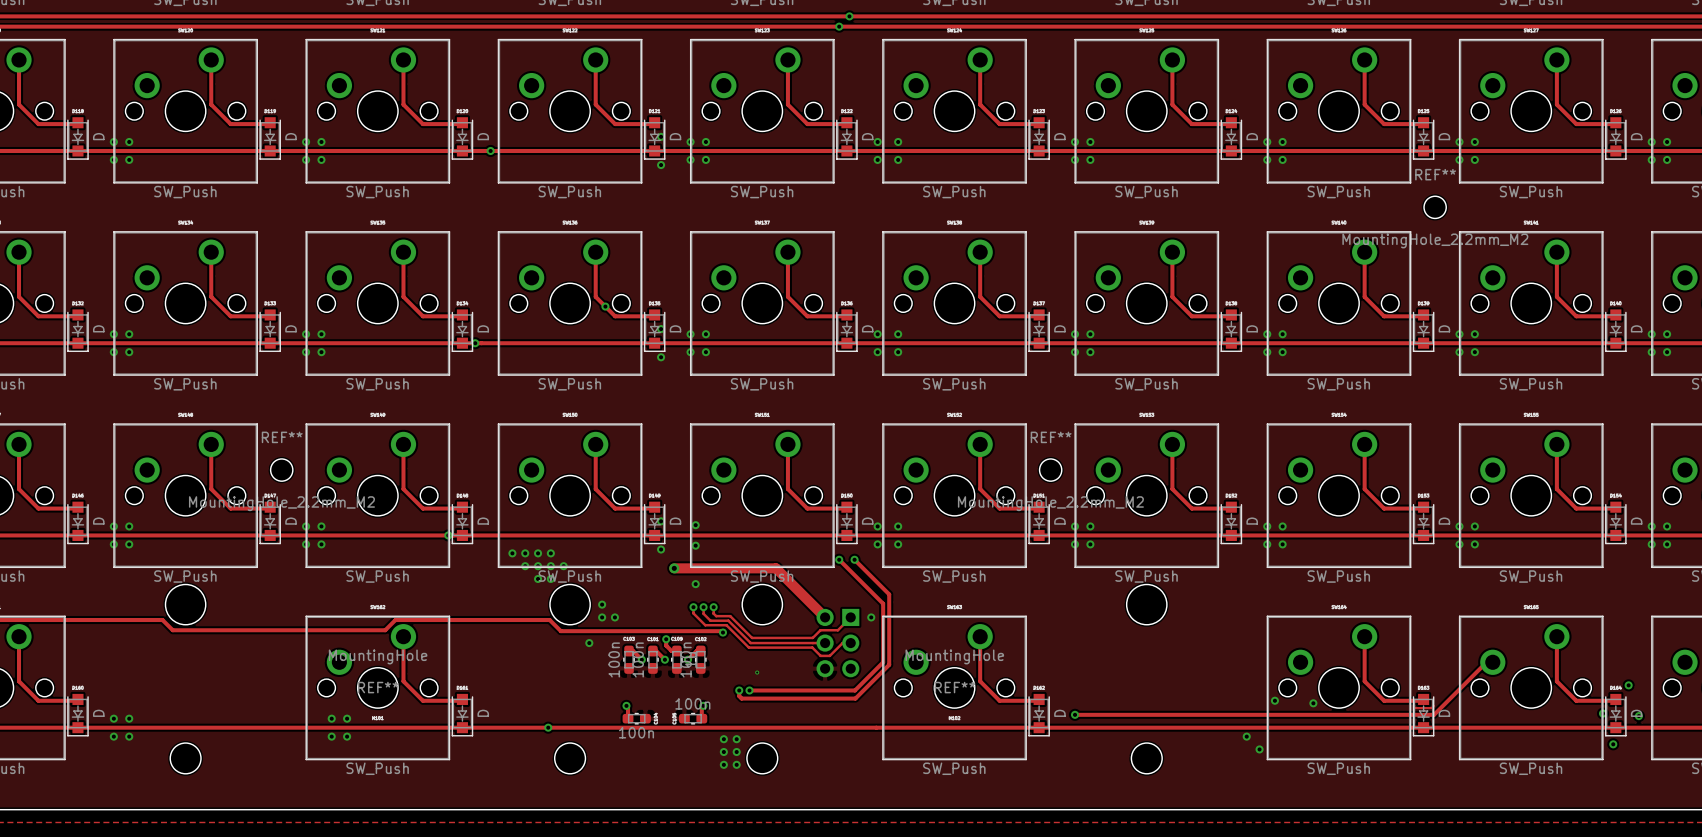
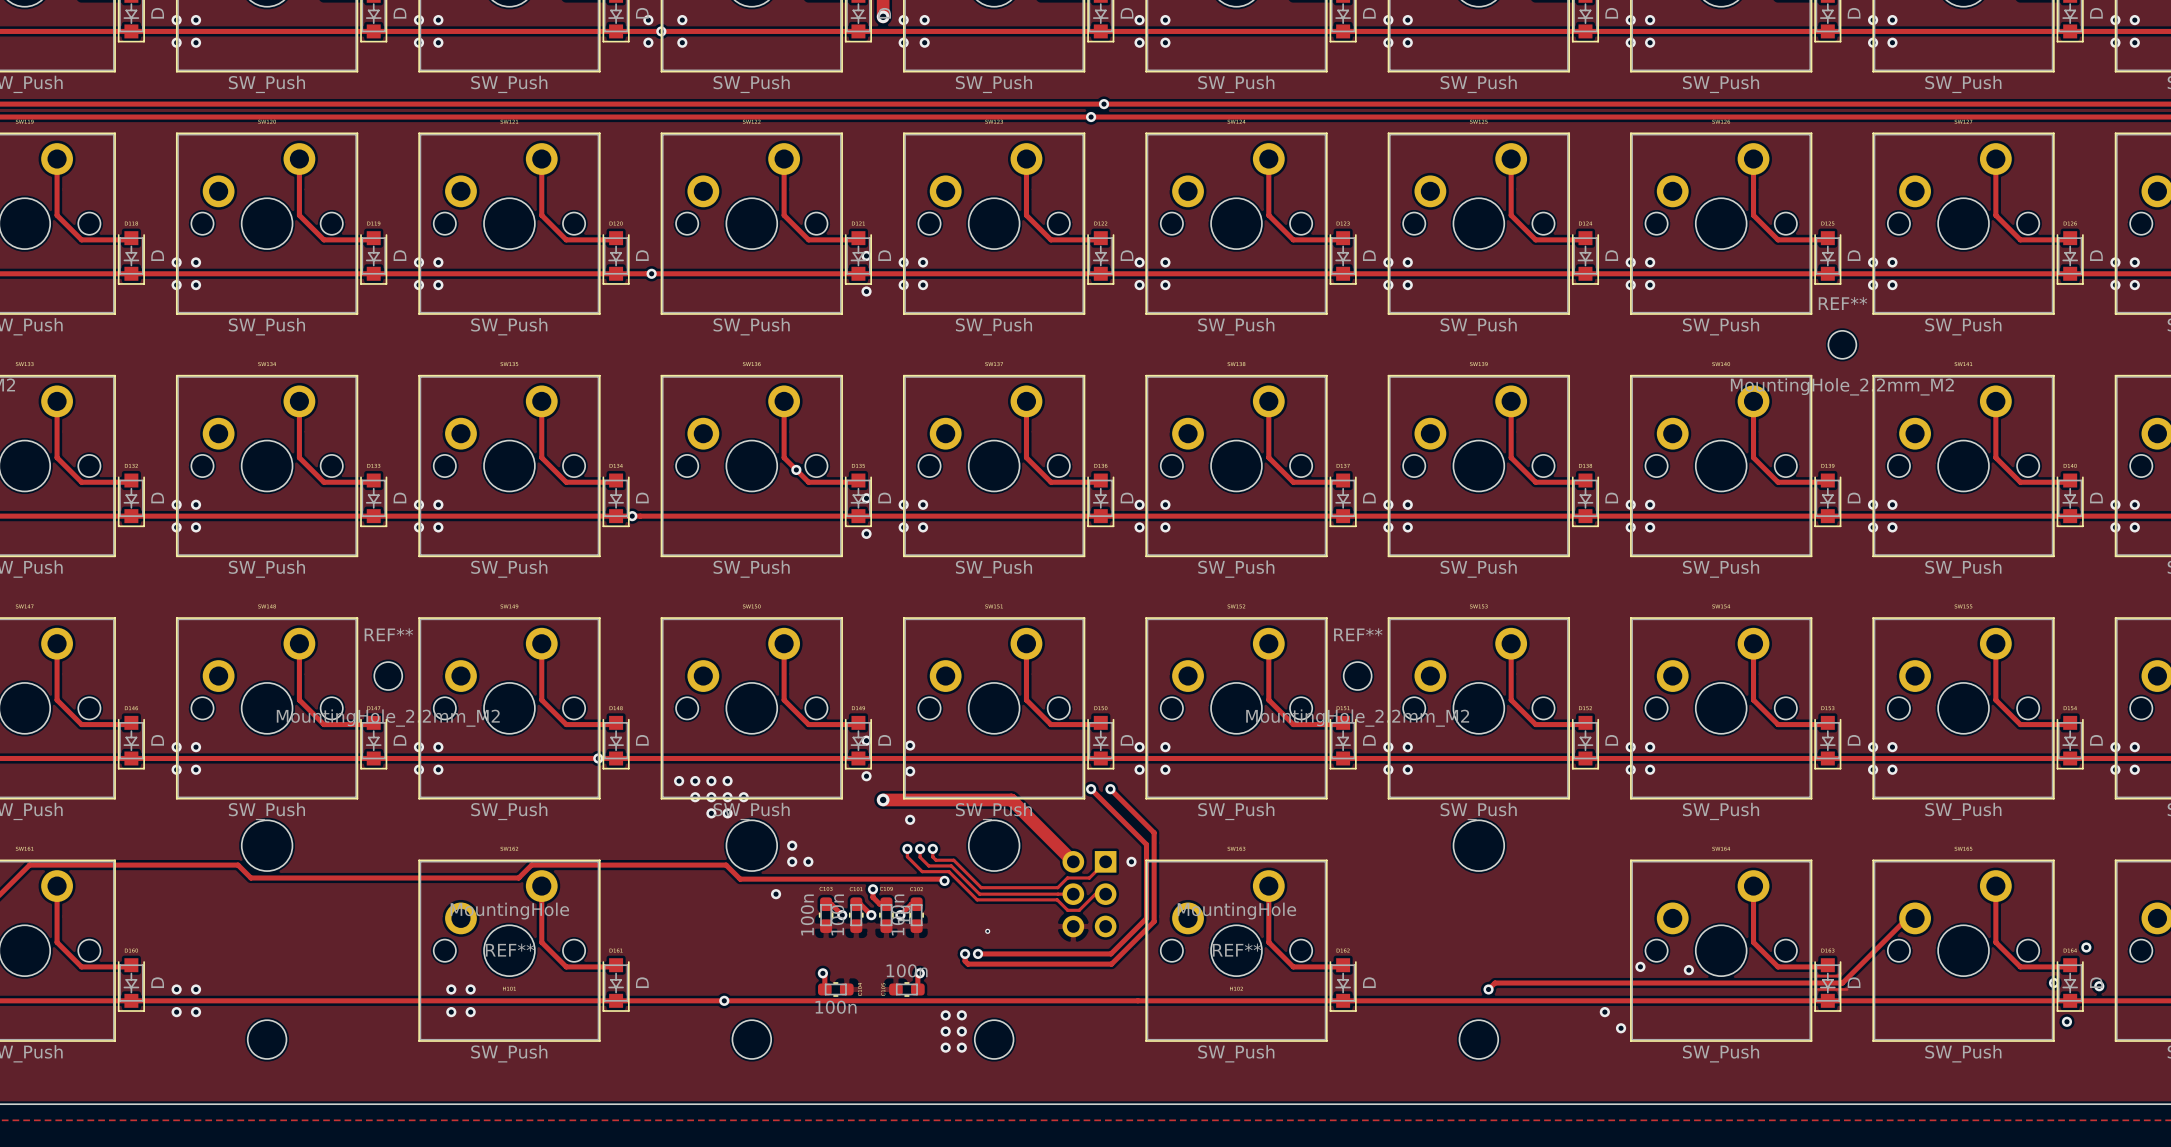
track: (1435, 713) (1075, 714) -> (1842, 983) (1495, 983) (1488, 989)
via: (1075, 714) -> none
via: none -> (1488, 989)
track: none -> (1818, 989) (1847, 989)

